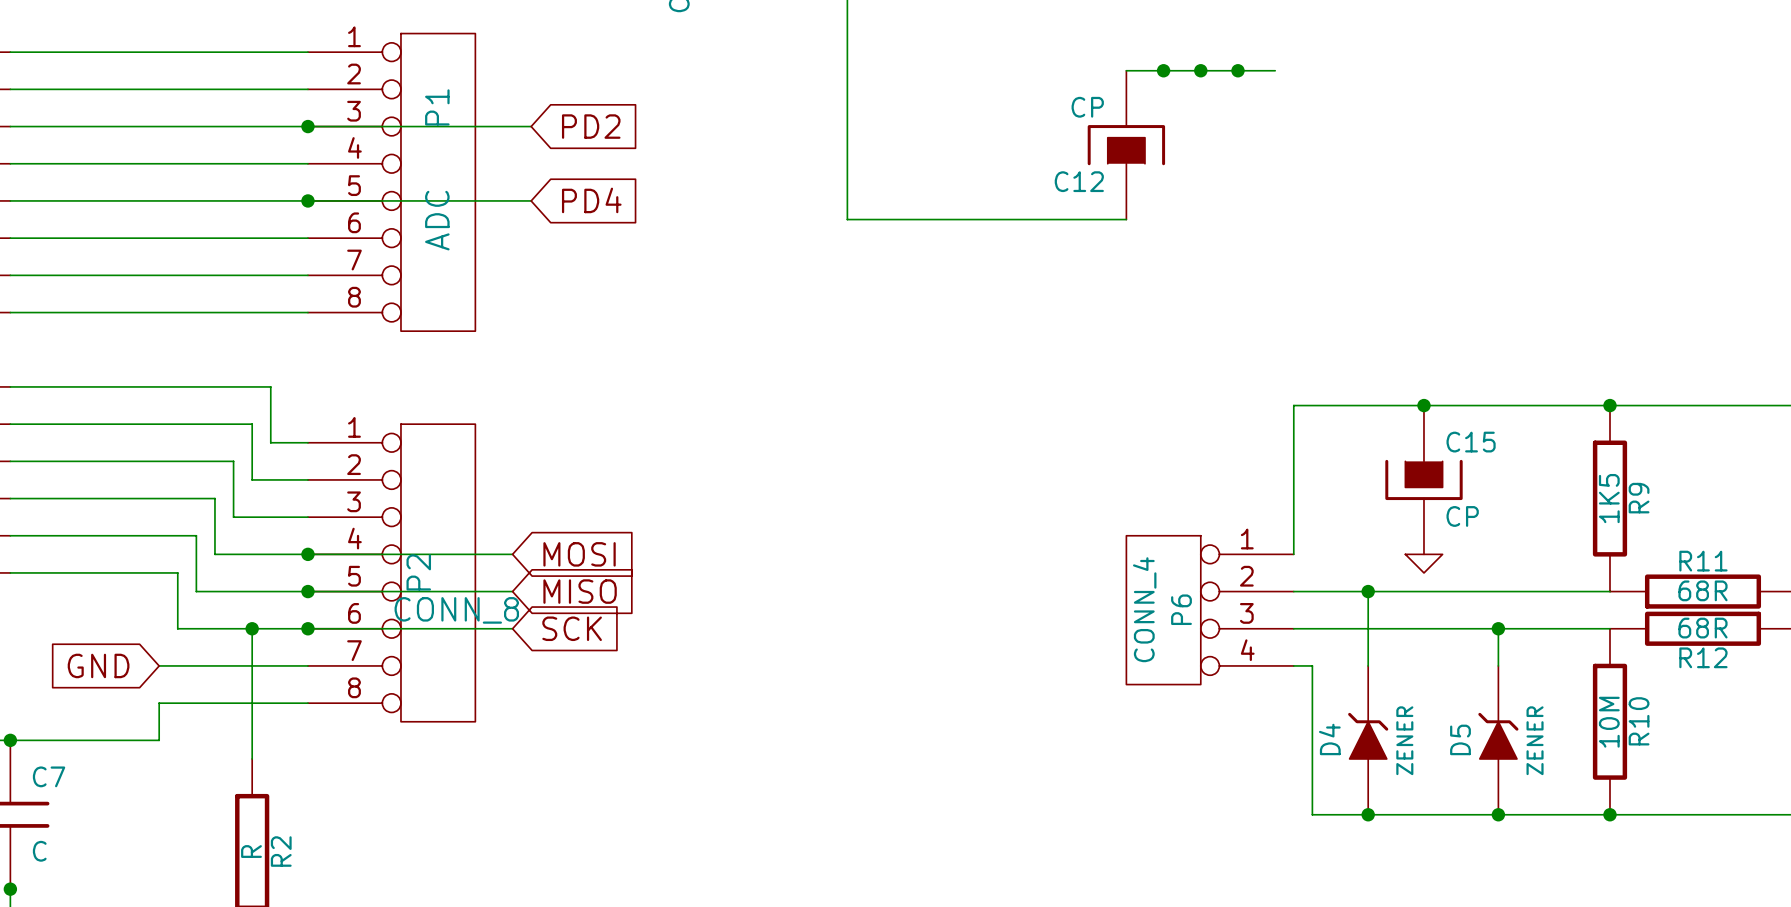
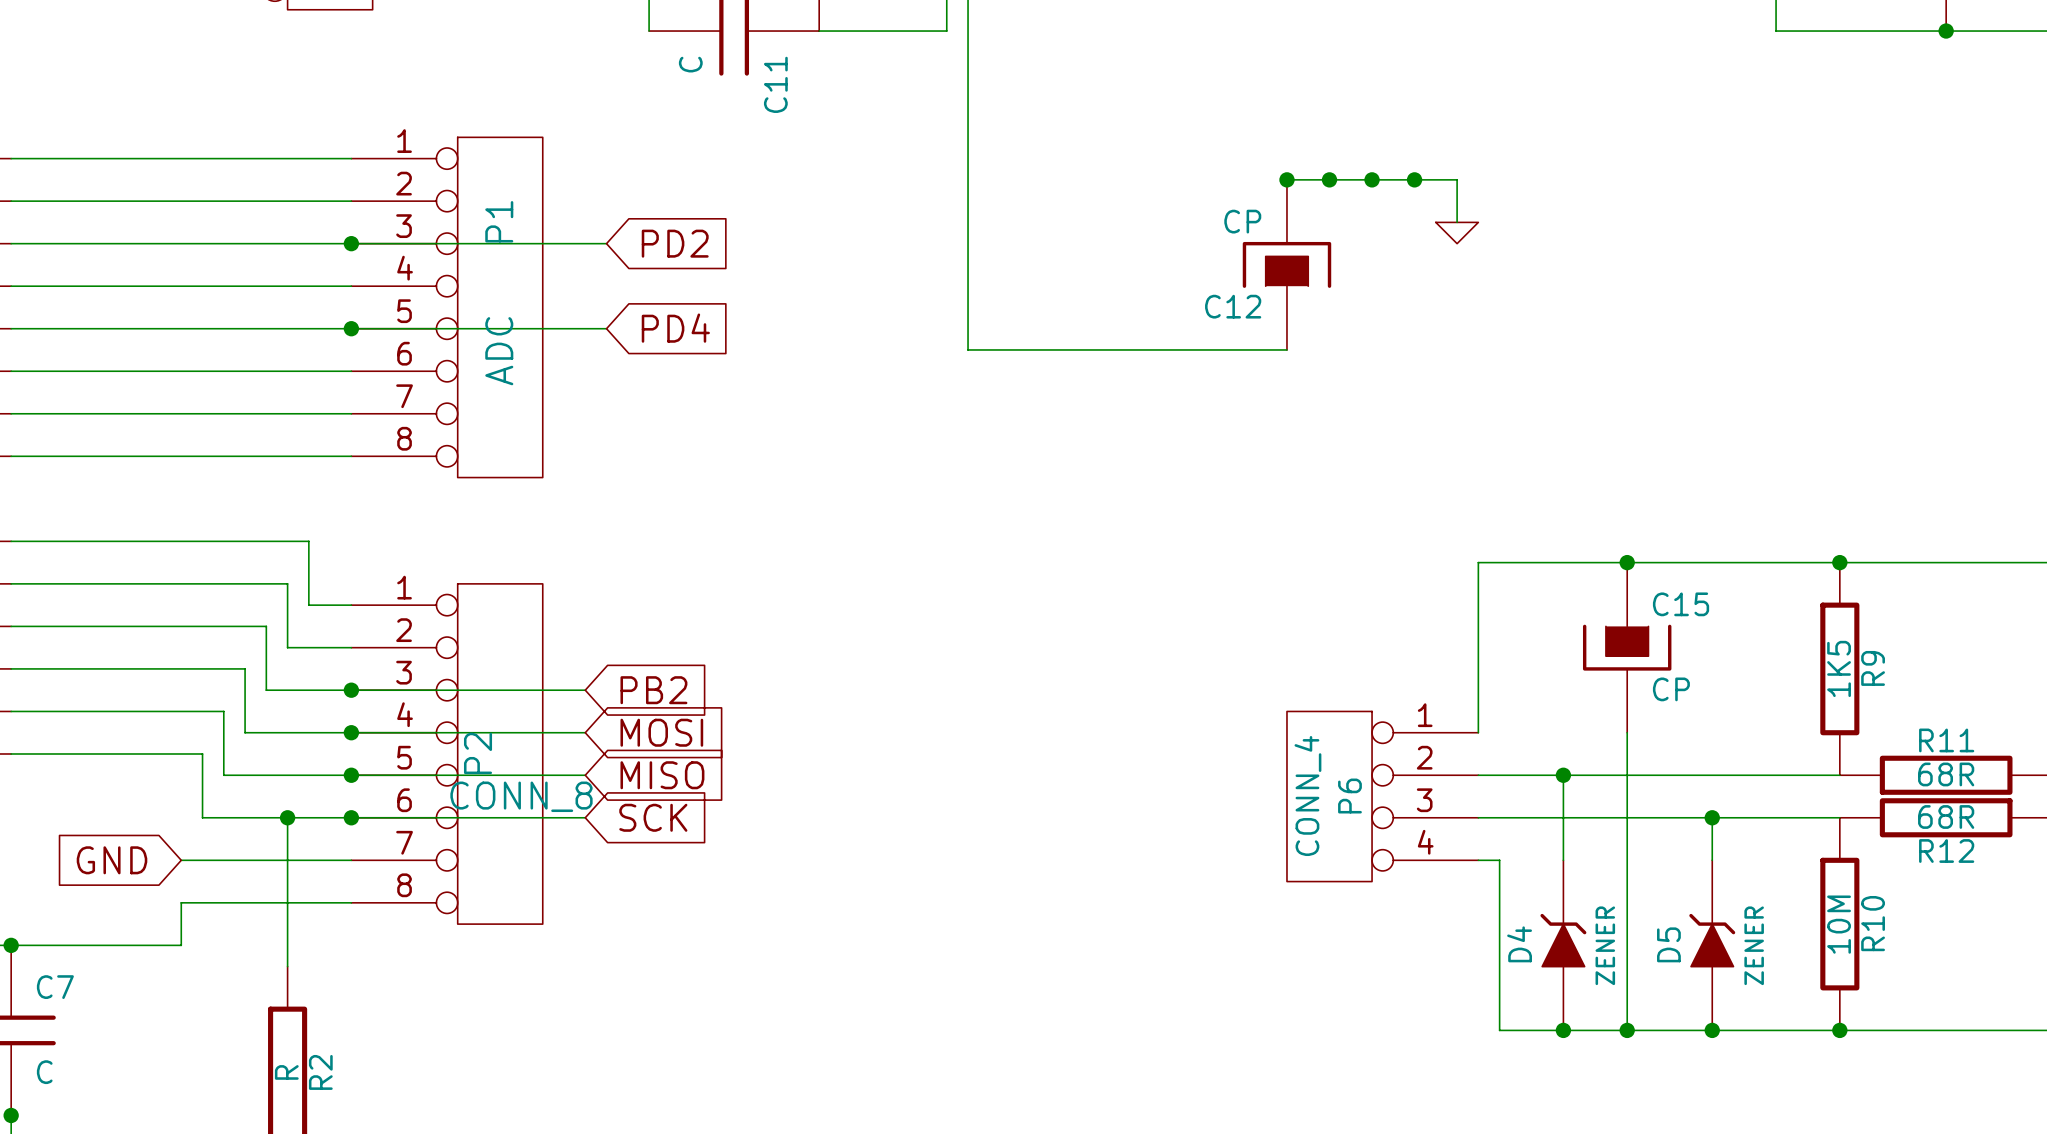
junction: none -> (1286, 179)
wire: none -> (1457, 179) (1457, 222)
power symbol: none -> (1457, 233)
wire: none -> (351, 690) (585, 690)
junction: none -> (351, 690)
global label: none -> PB2 (653, 690)
wire: none -> (1627, 732) (1627, 1030)
power symbol: (1423, 563) -> none
junction: none -> (1627, 1030)

